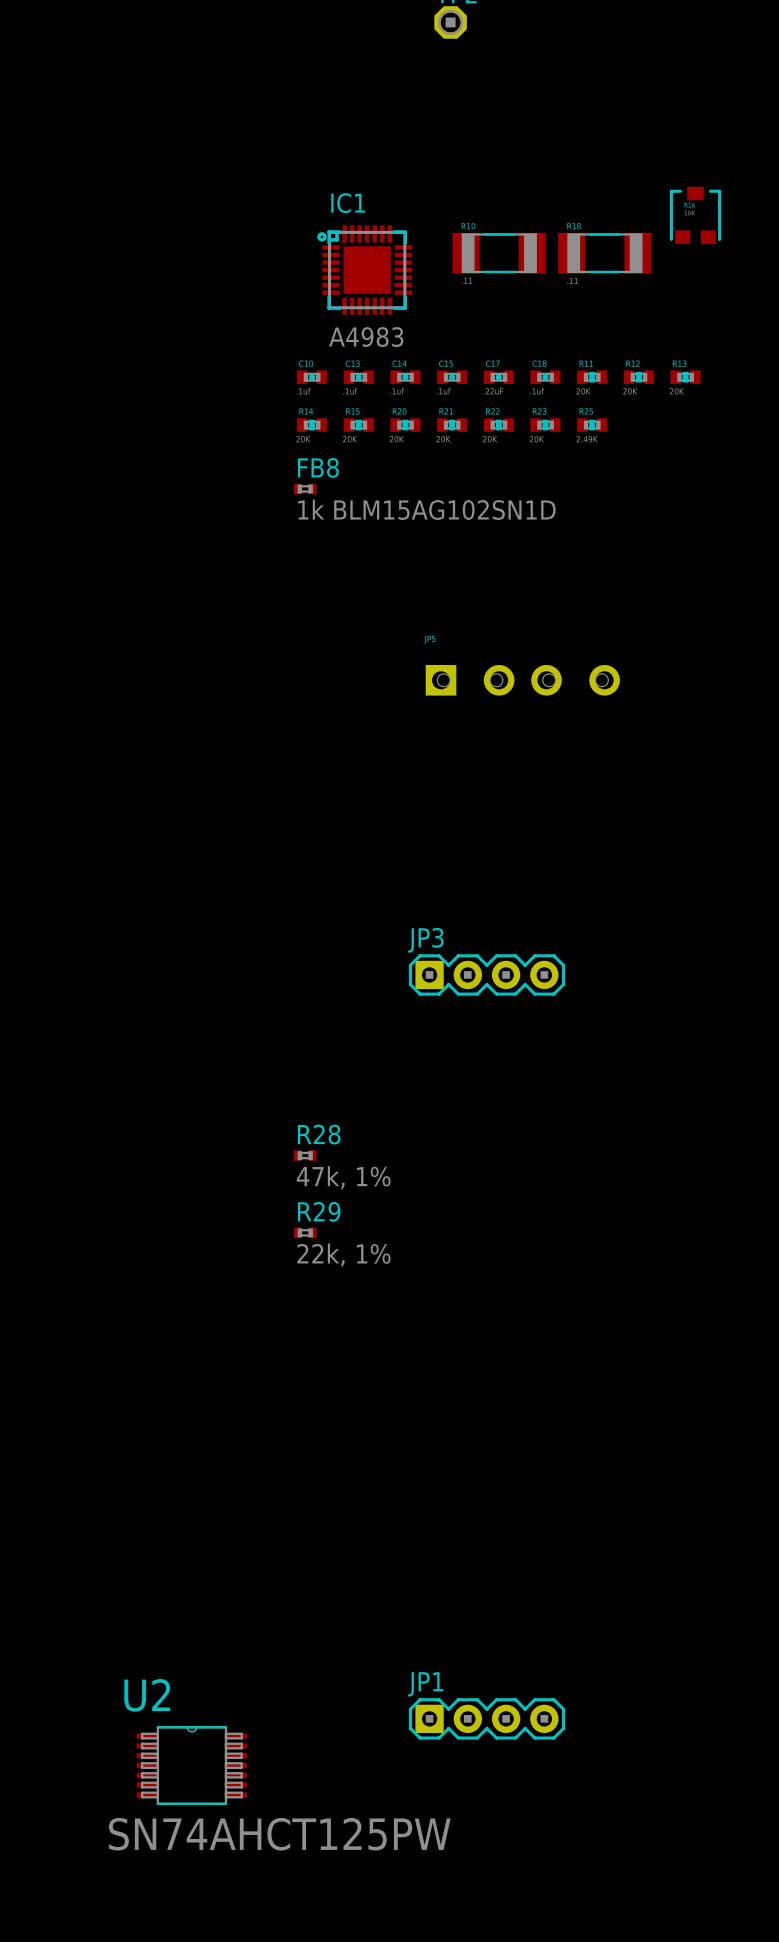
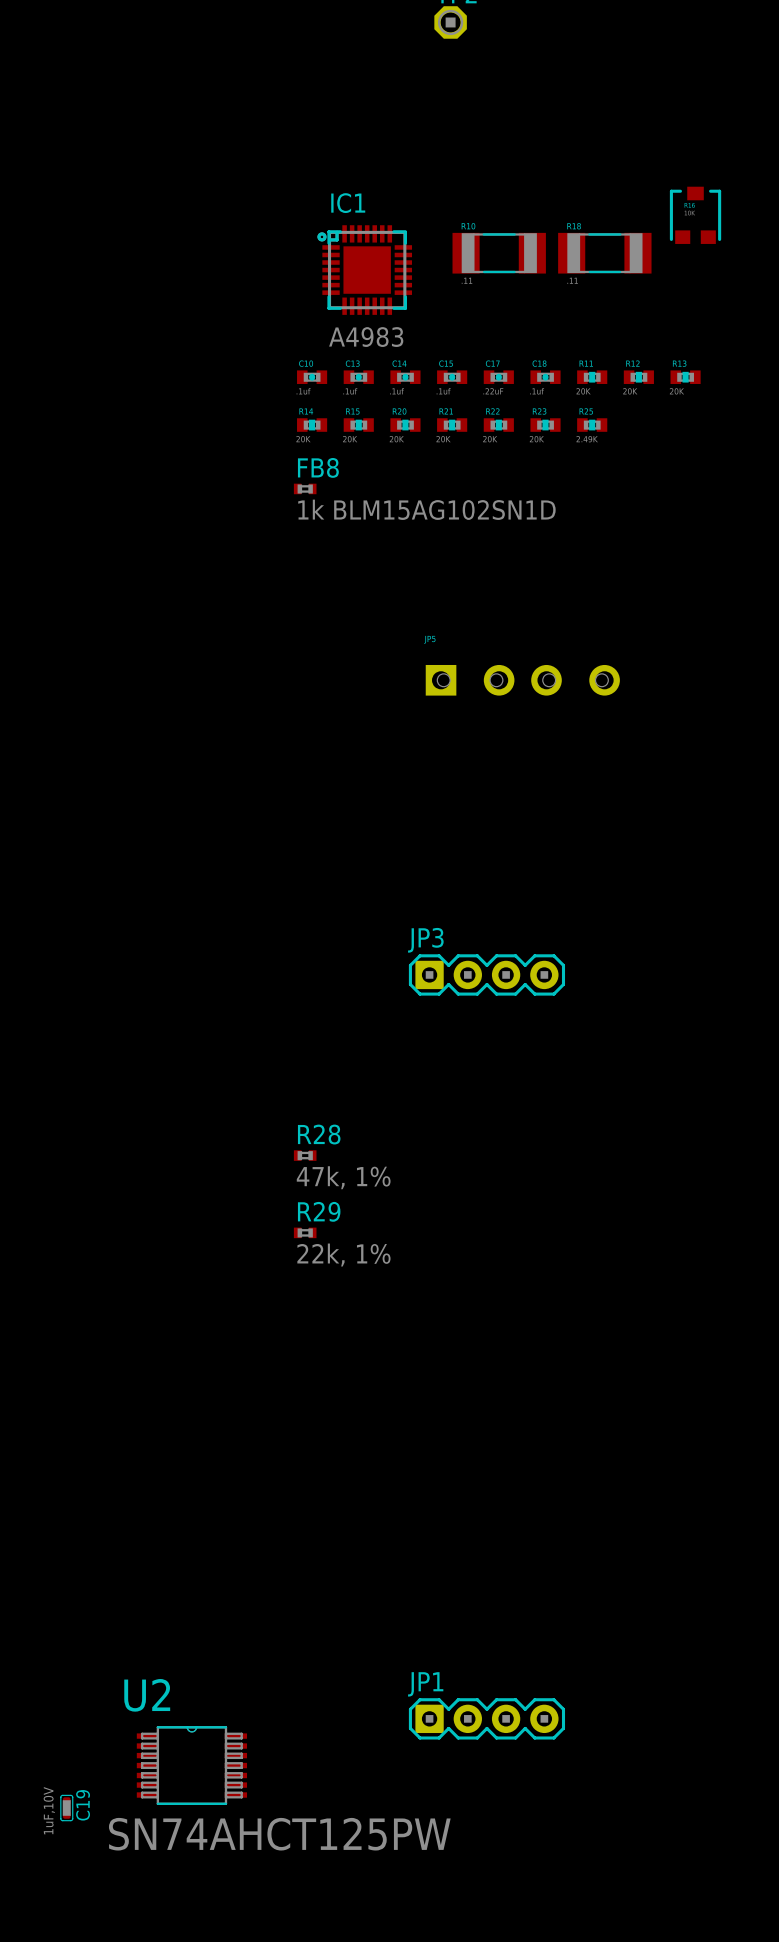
C19: none -> 1uF,10V (66, 1808)

